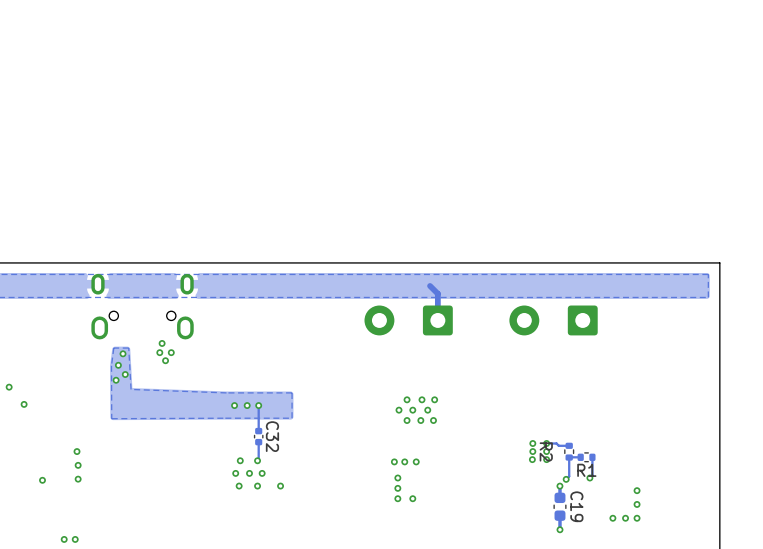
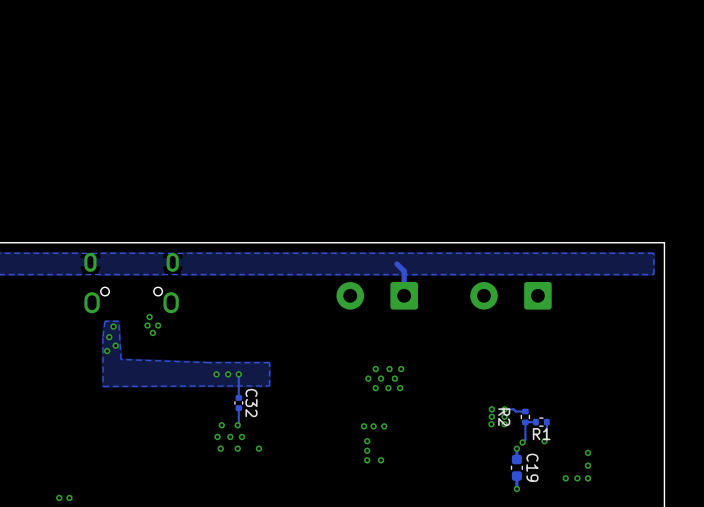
via: (9, 387) -> none
via: (24, 404) -> none
via: (77, 451) -> none
via: (78, 465) -> none
via: (78, 479) -> none
via: (42, 480) -> none

